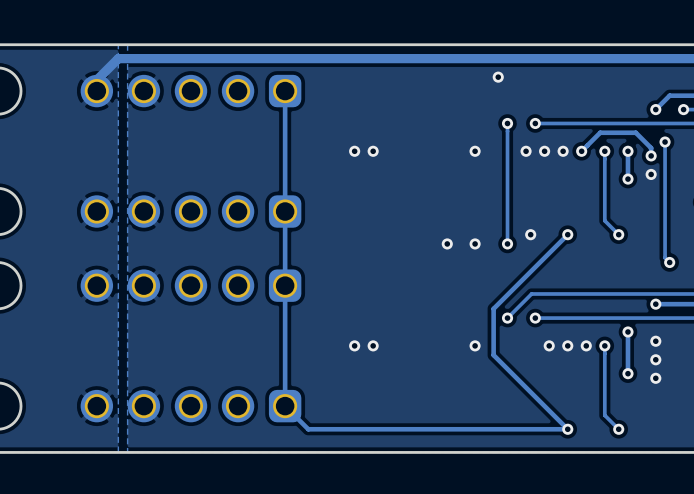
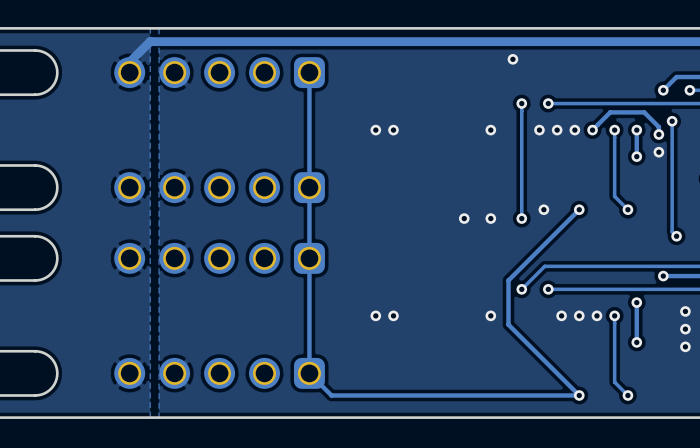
via: (655, 341) -> none
via: none -> (685, 311)
via: (655, 359) -> none
via: none -> (685, 329)
via: (655, 378) -> none
via: none -> (685, 346)

